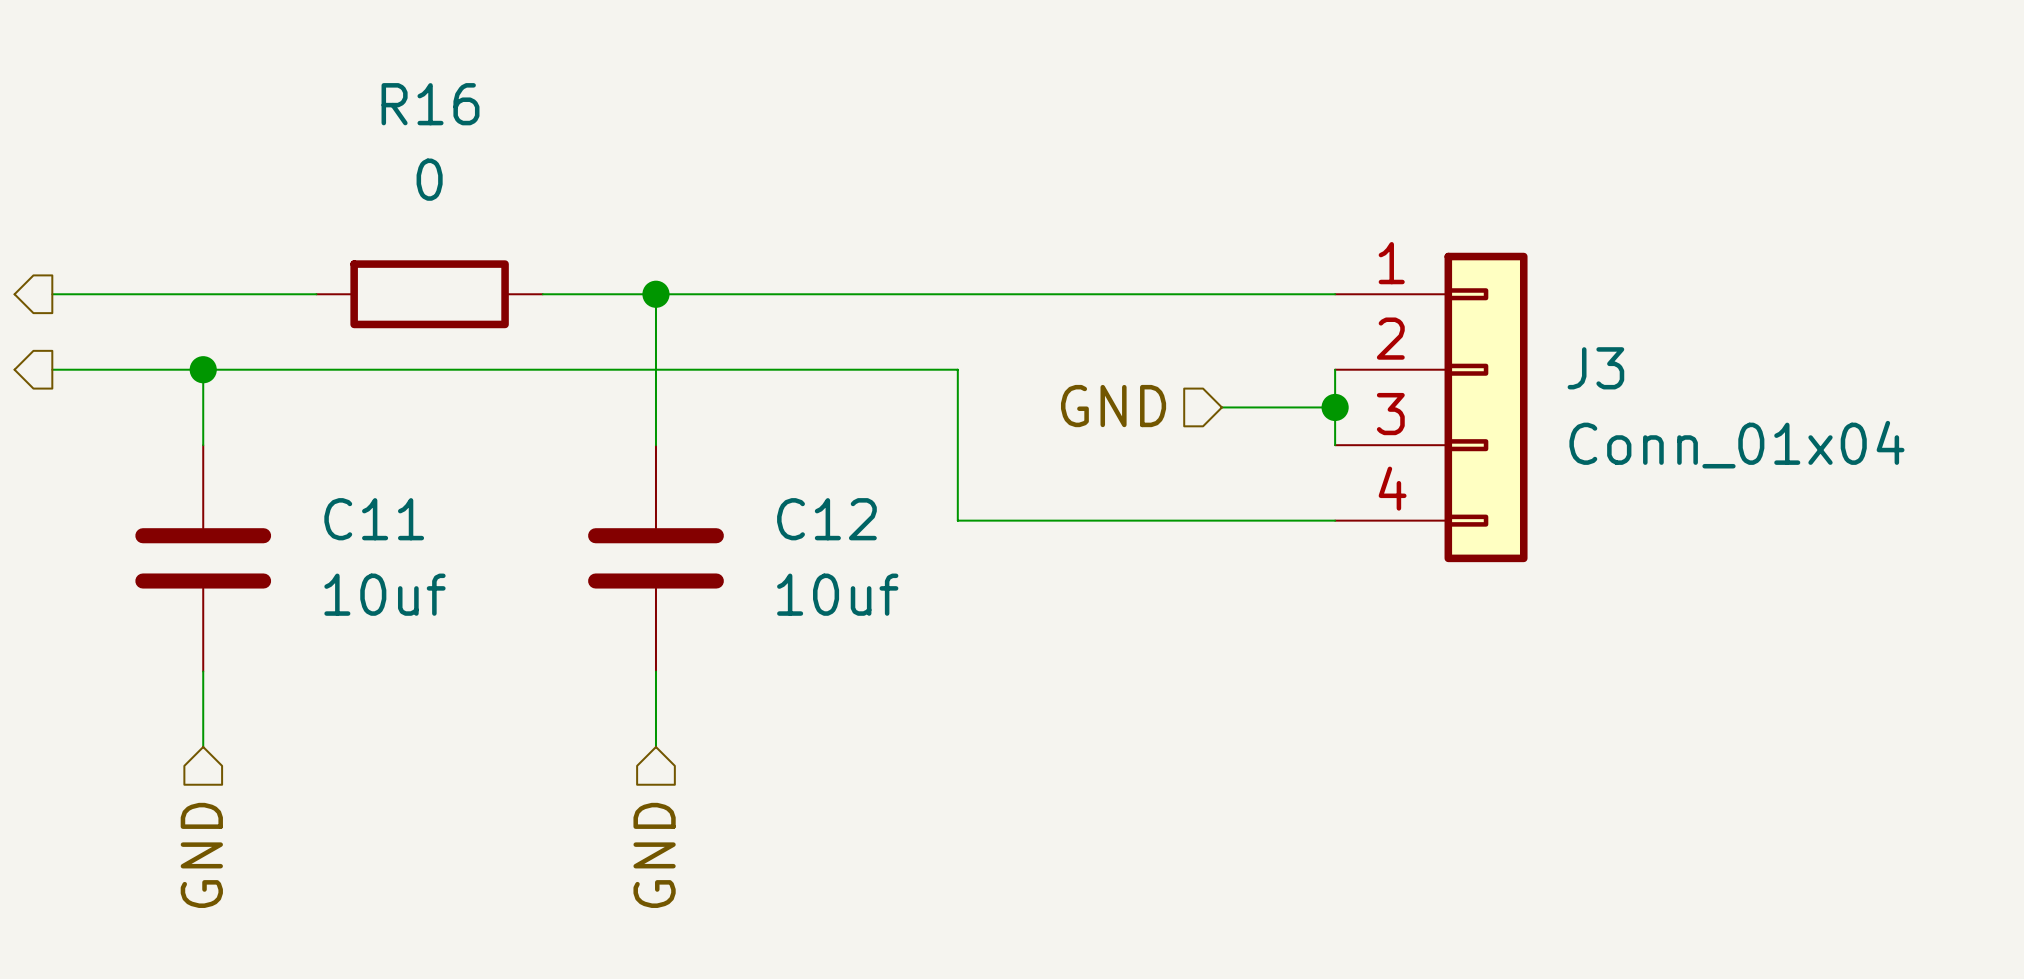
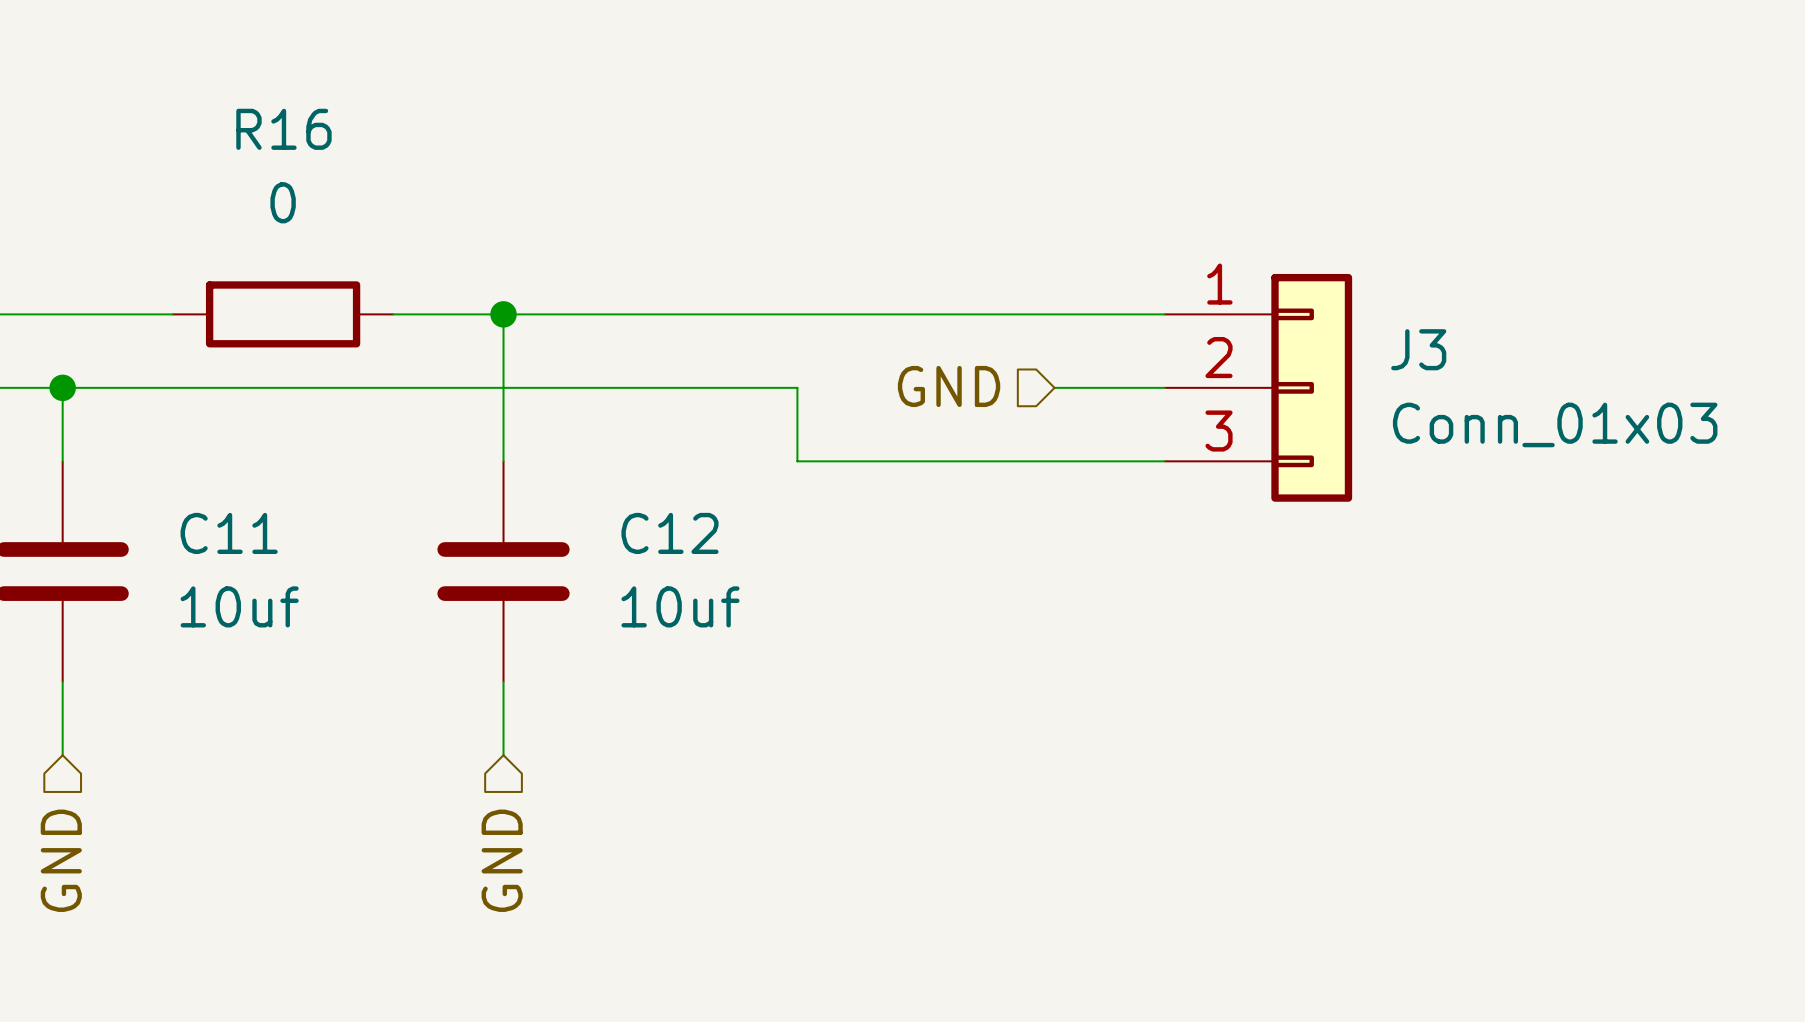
J3 symbol: [1335, 252, 1528, 563] -> [1164, 273, 1353, 502]
wire: (1335, 369) (1335, 445) -> (1164, 387) (1054, 387)
hierarchical label position: GND (1113, 406) -> GND (949, 386)
wire: (1221, 407) (1335, 407) -> none
junction: (1335, 407) -> none
J3 value: Conn_01x04 (1736, 444) -> Conn_01x03 (1555, 424)
wire: (957, 445) (957, 520) (1335, 520) -> (797, 461) (1164, 461)

